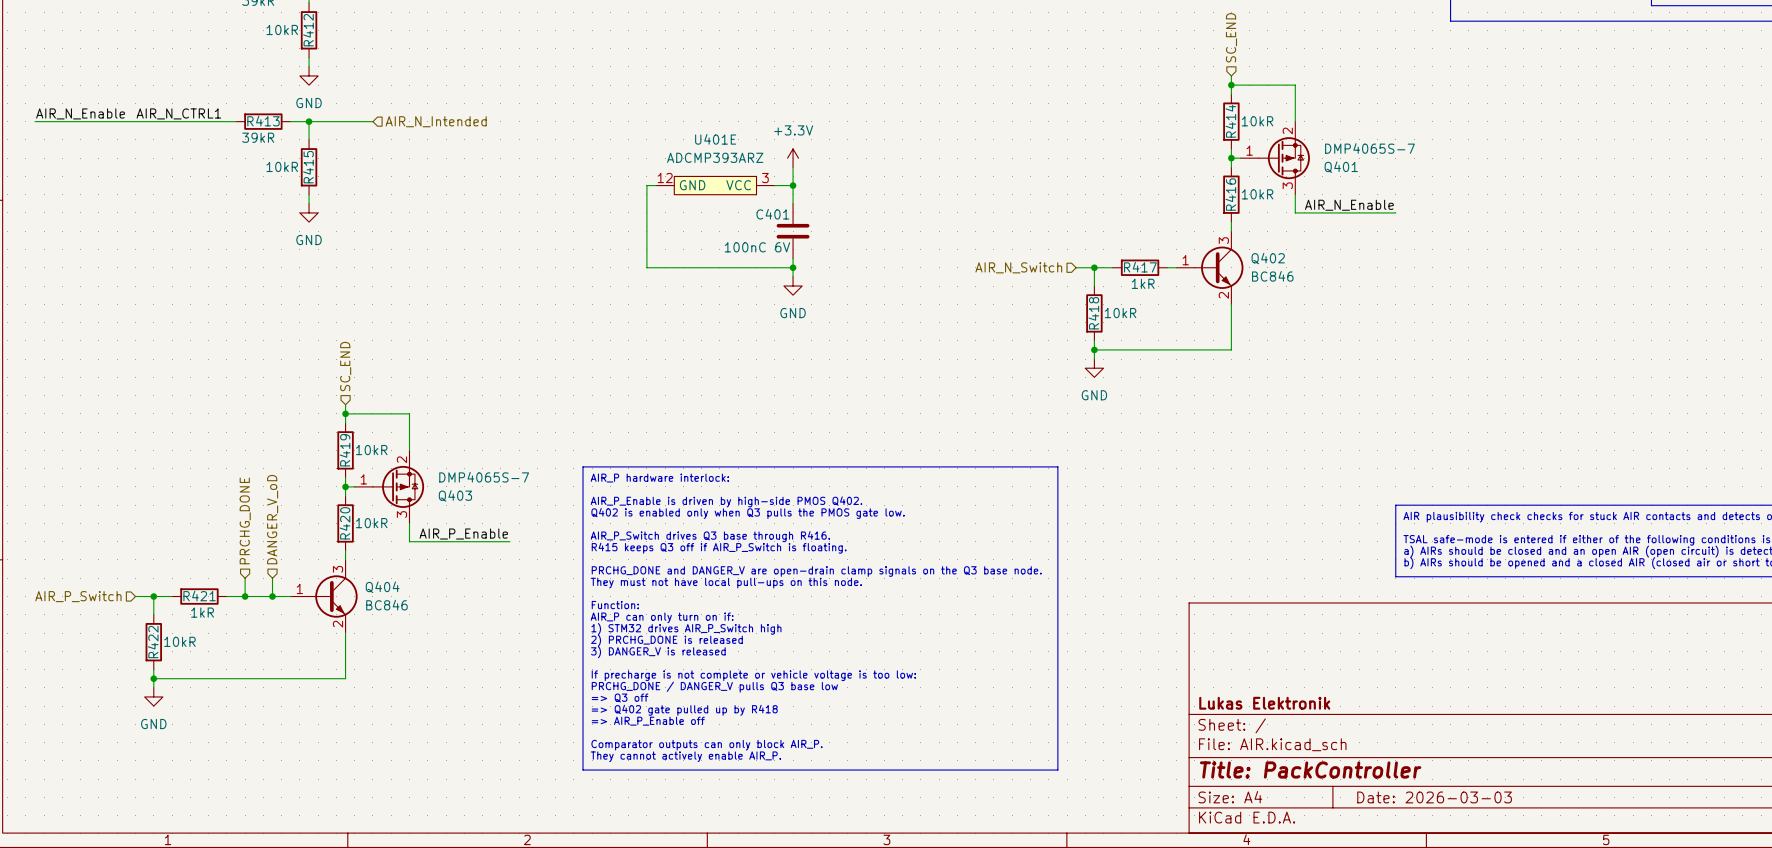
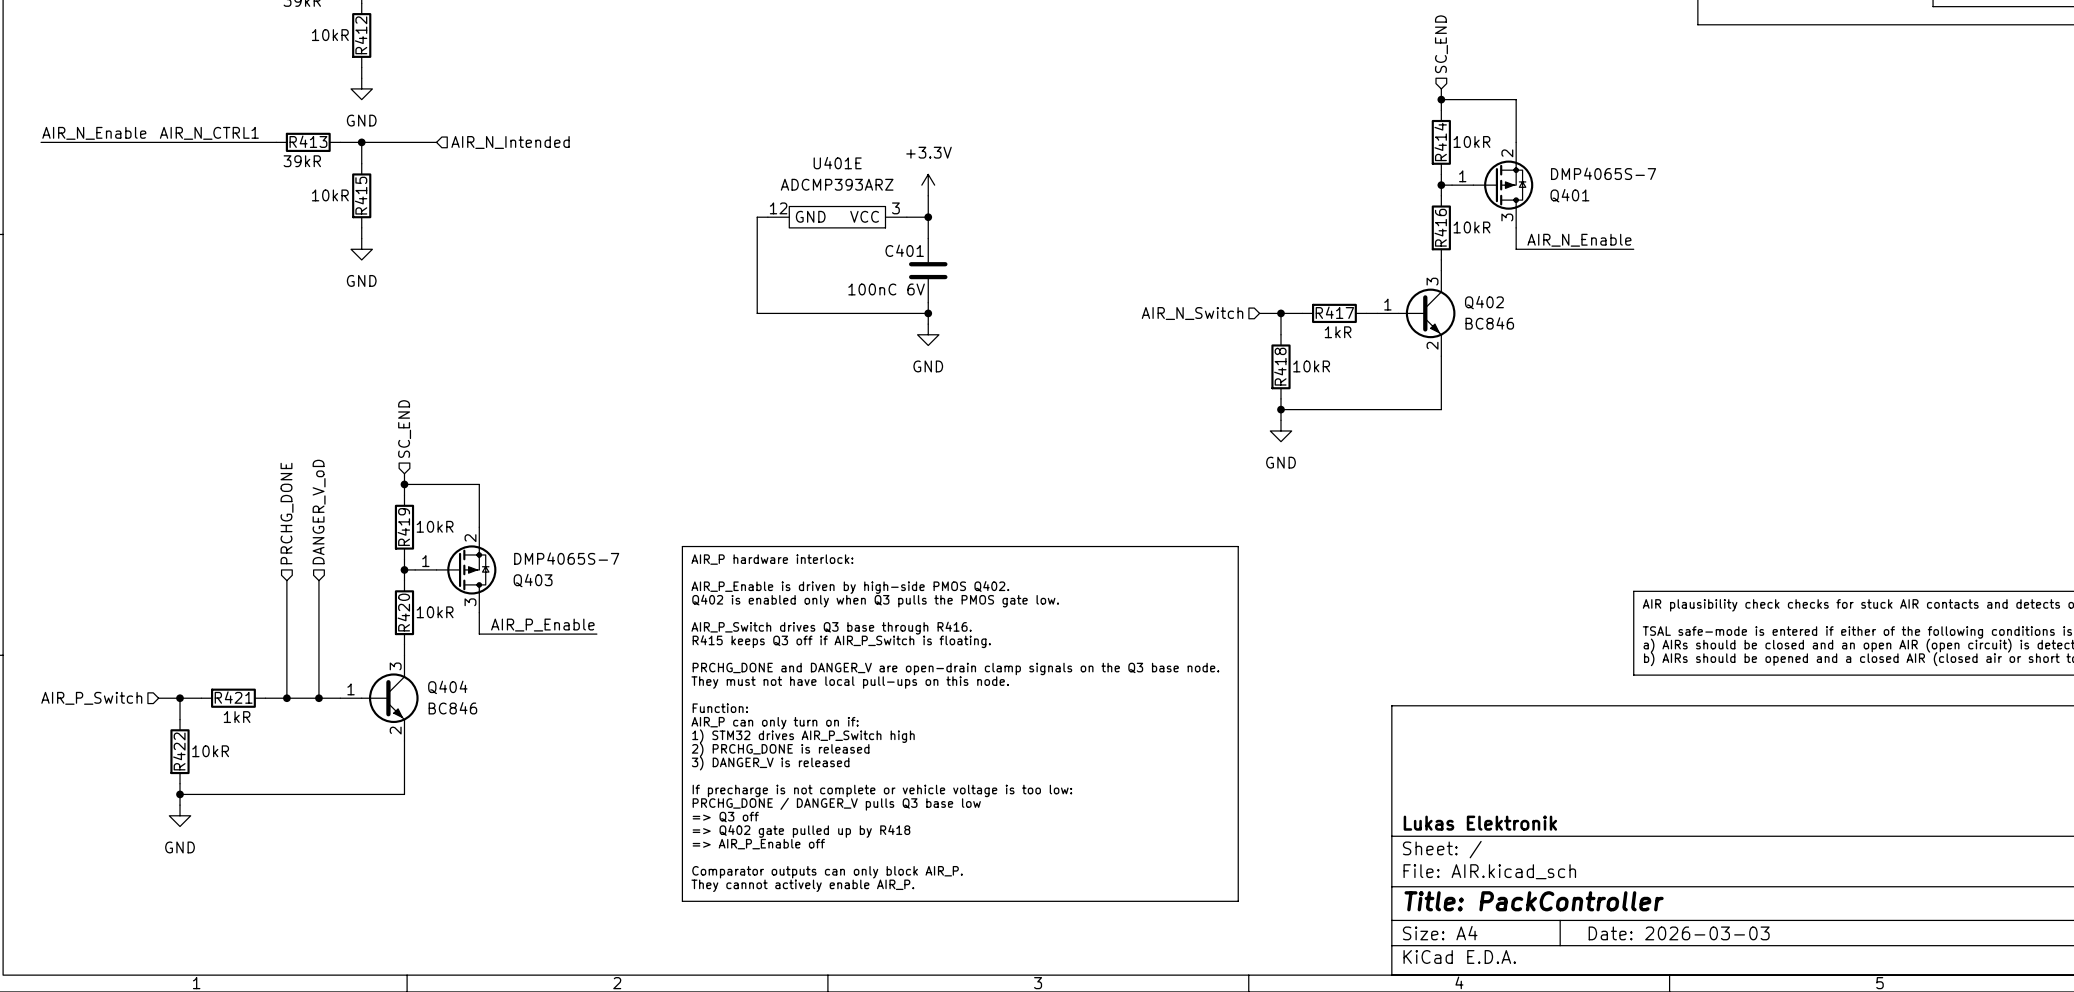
wire: none -> (286, 580) (286, 676)
wire: none -> (318, 580) (318, 676)
hierarchical label position: DANGER_V_oD (272, 519) -> DANGER_V_oD (319, 512)
hierarchical label position: PRCHG_DONE (245, 520) -> PRCHG_DONE (287, 513)

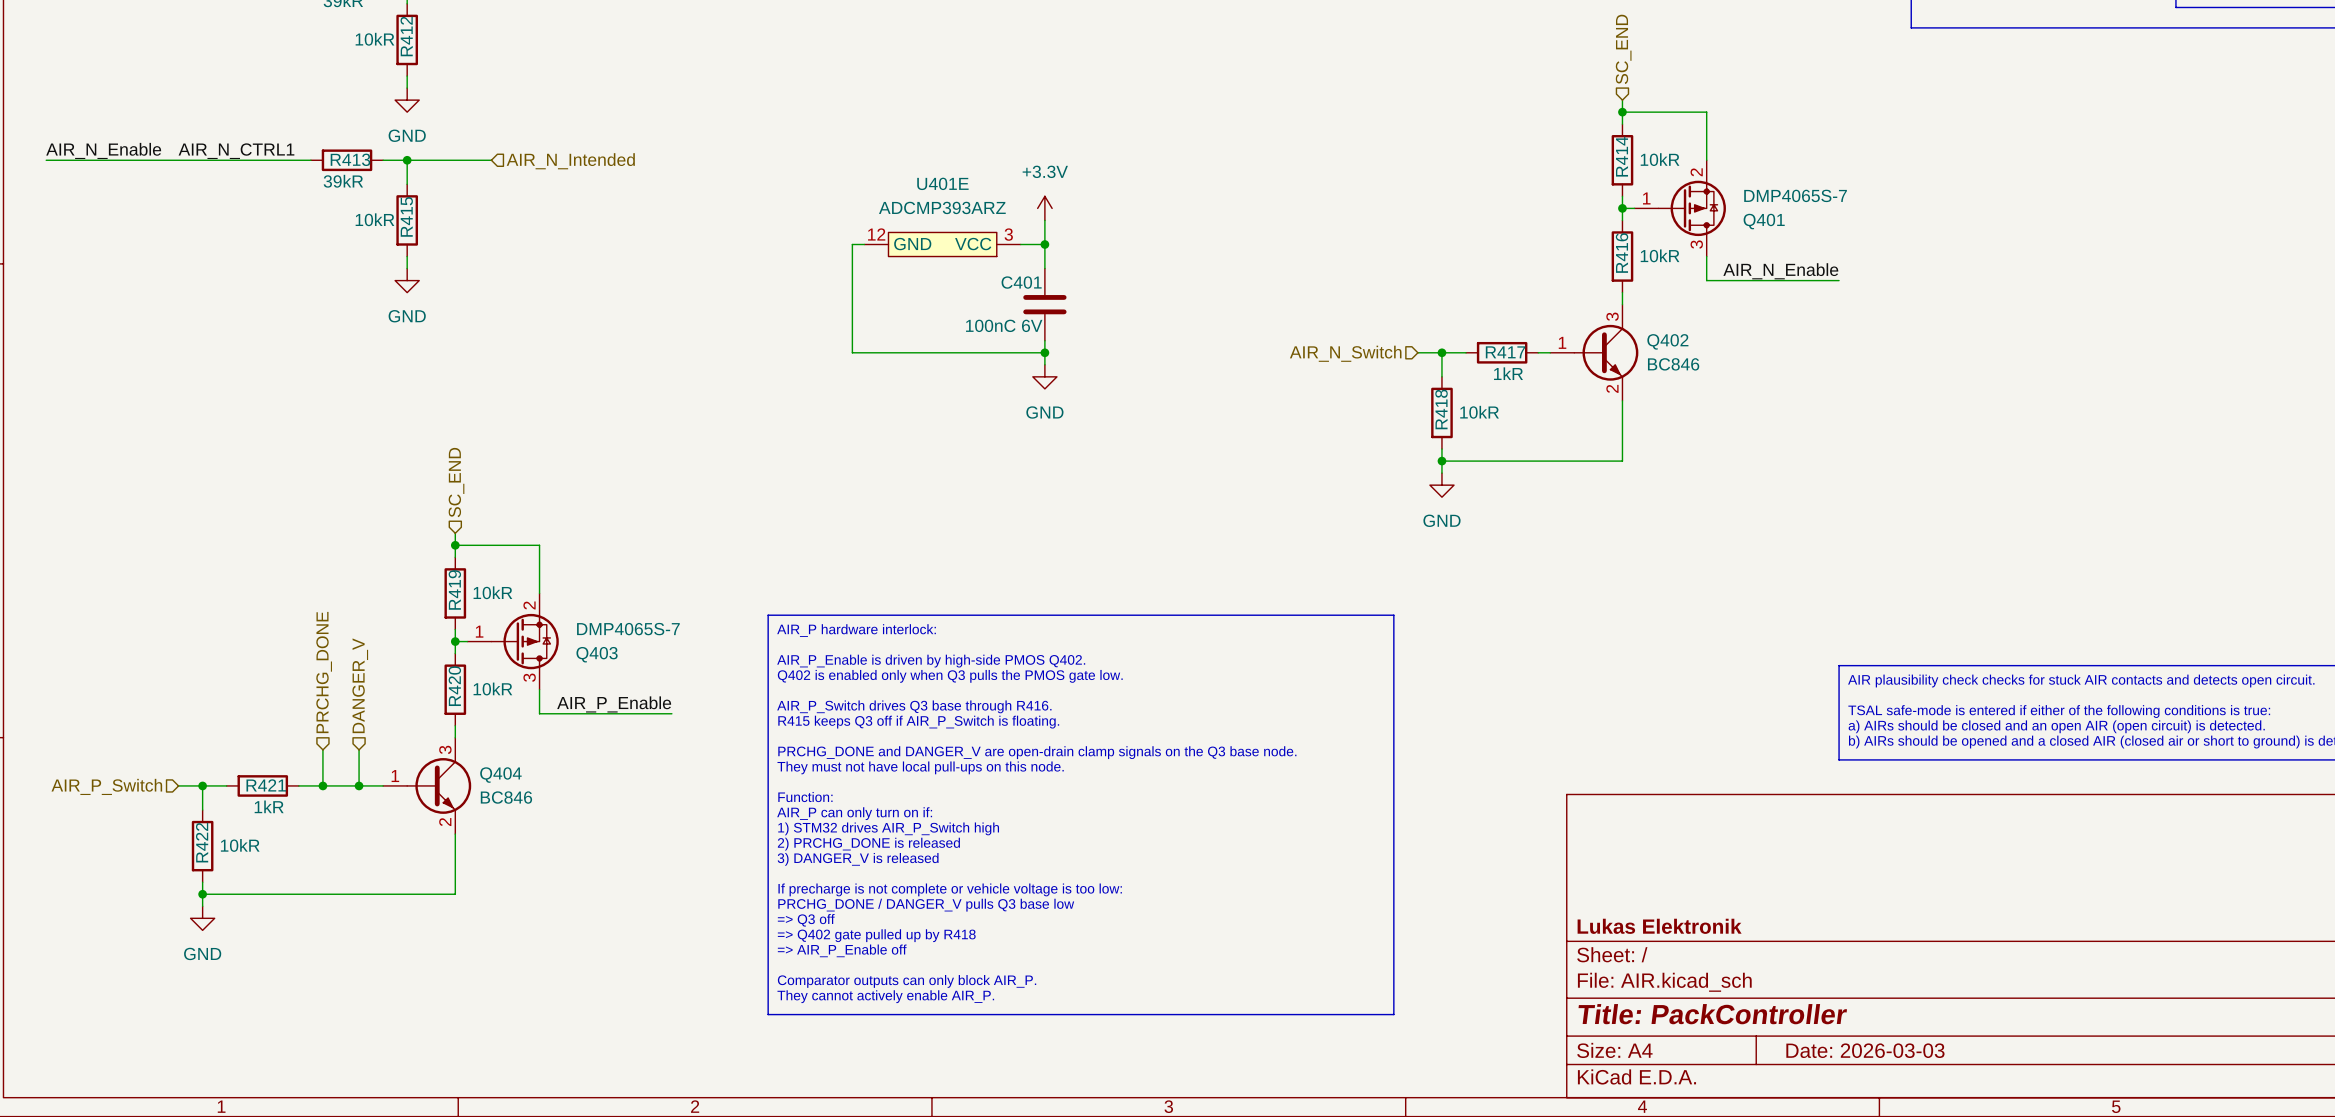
hierarchical label: DANGER_V_oD (319, 512) -> DANGER_V (360, 685)
hierarchical label position: PRCHG_DONE (287, 513) -> PRCHG_DONE (324, 672)
wire: (286, 580) (286, 666) -> none
wire: (318, 580) (318, 666) -> none

